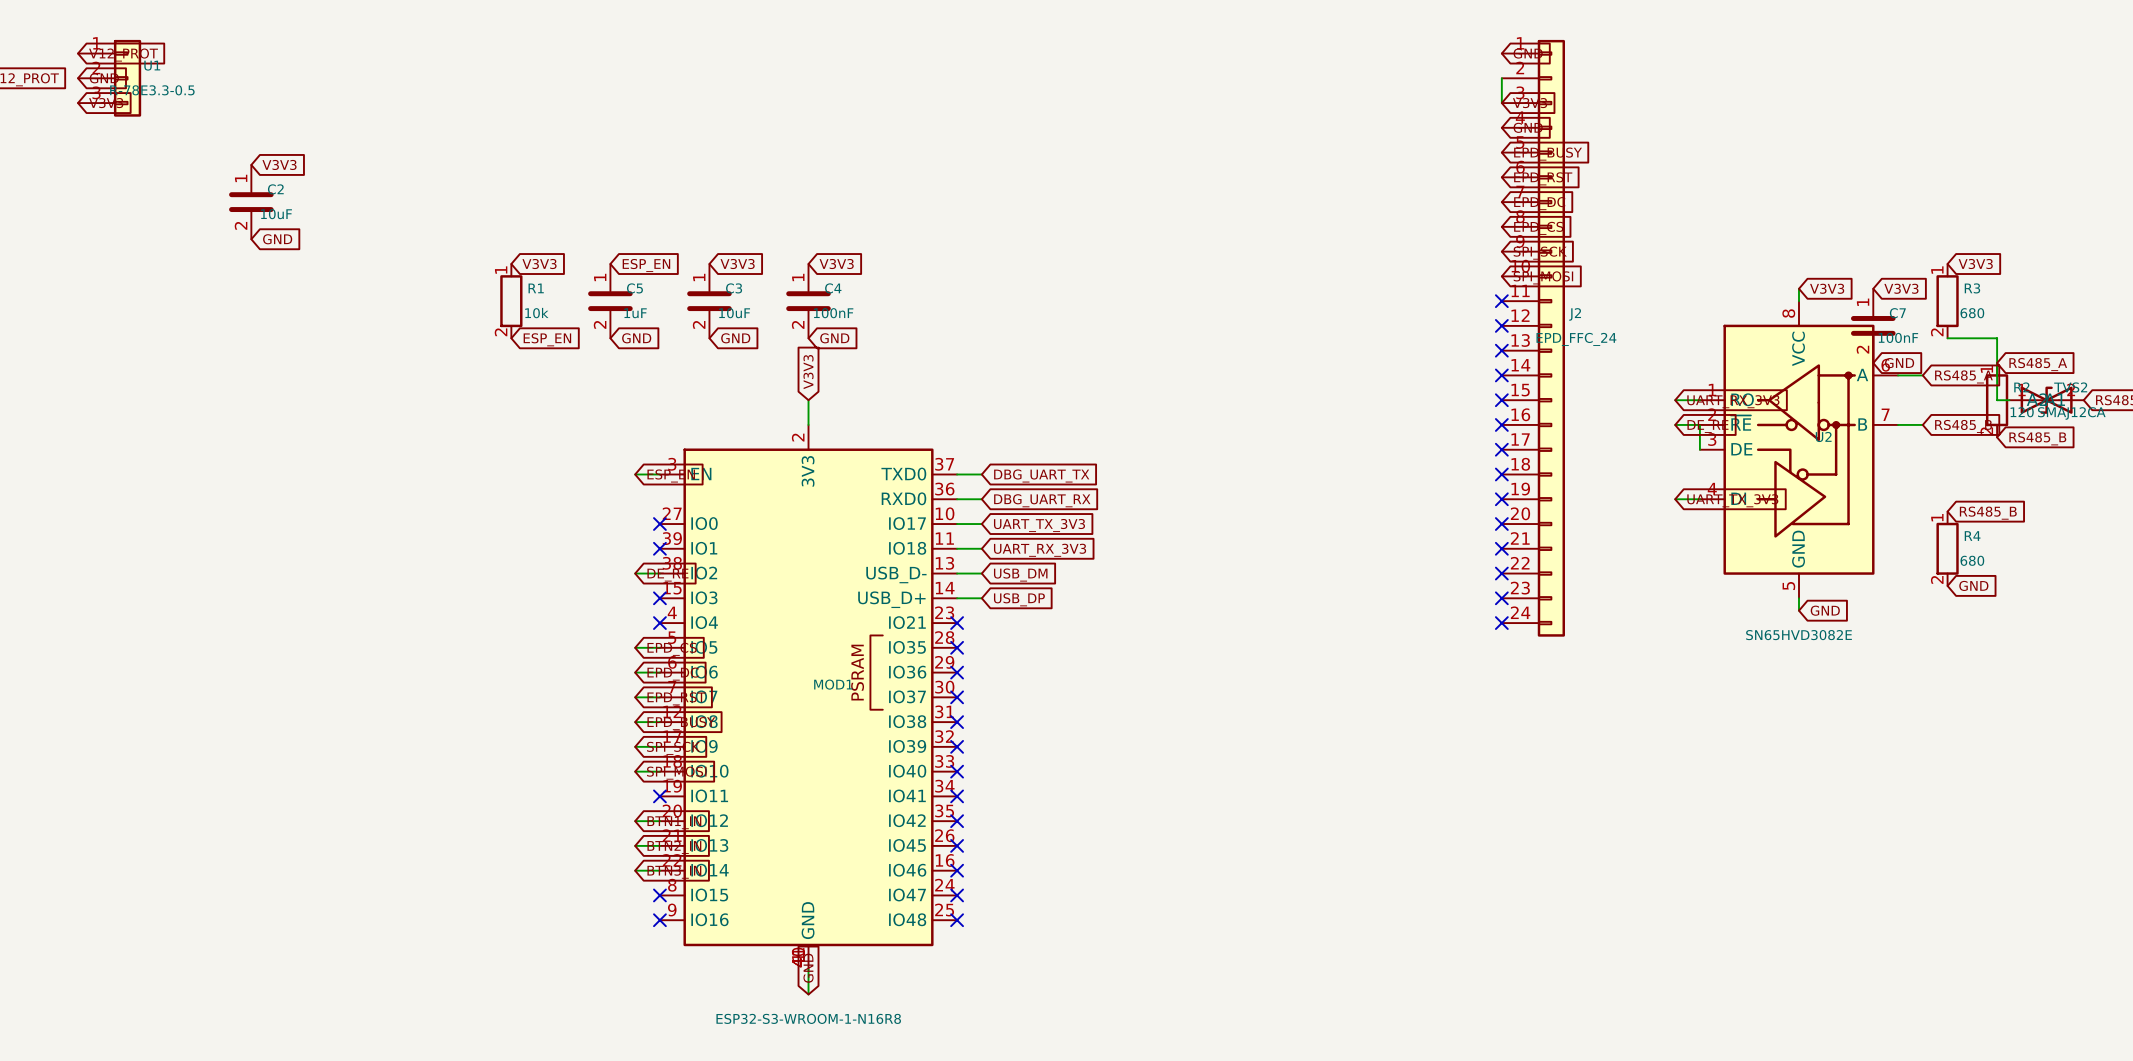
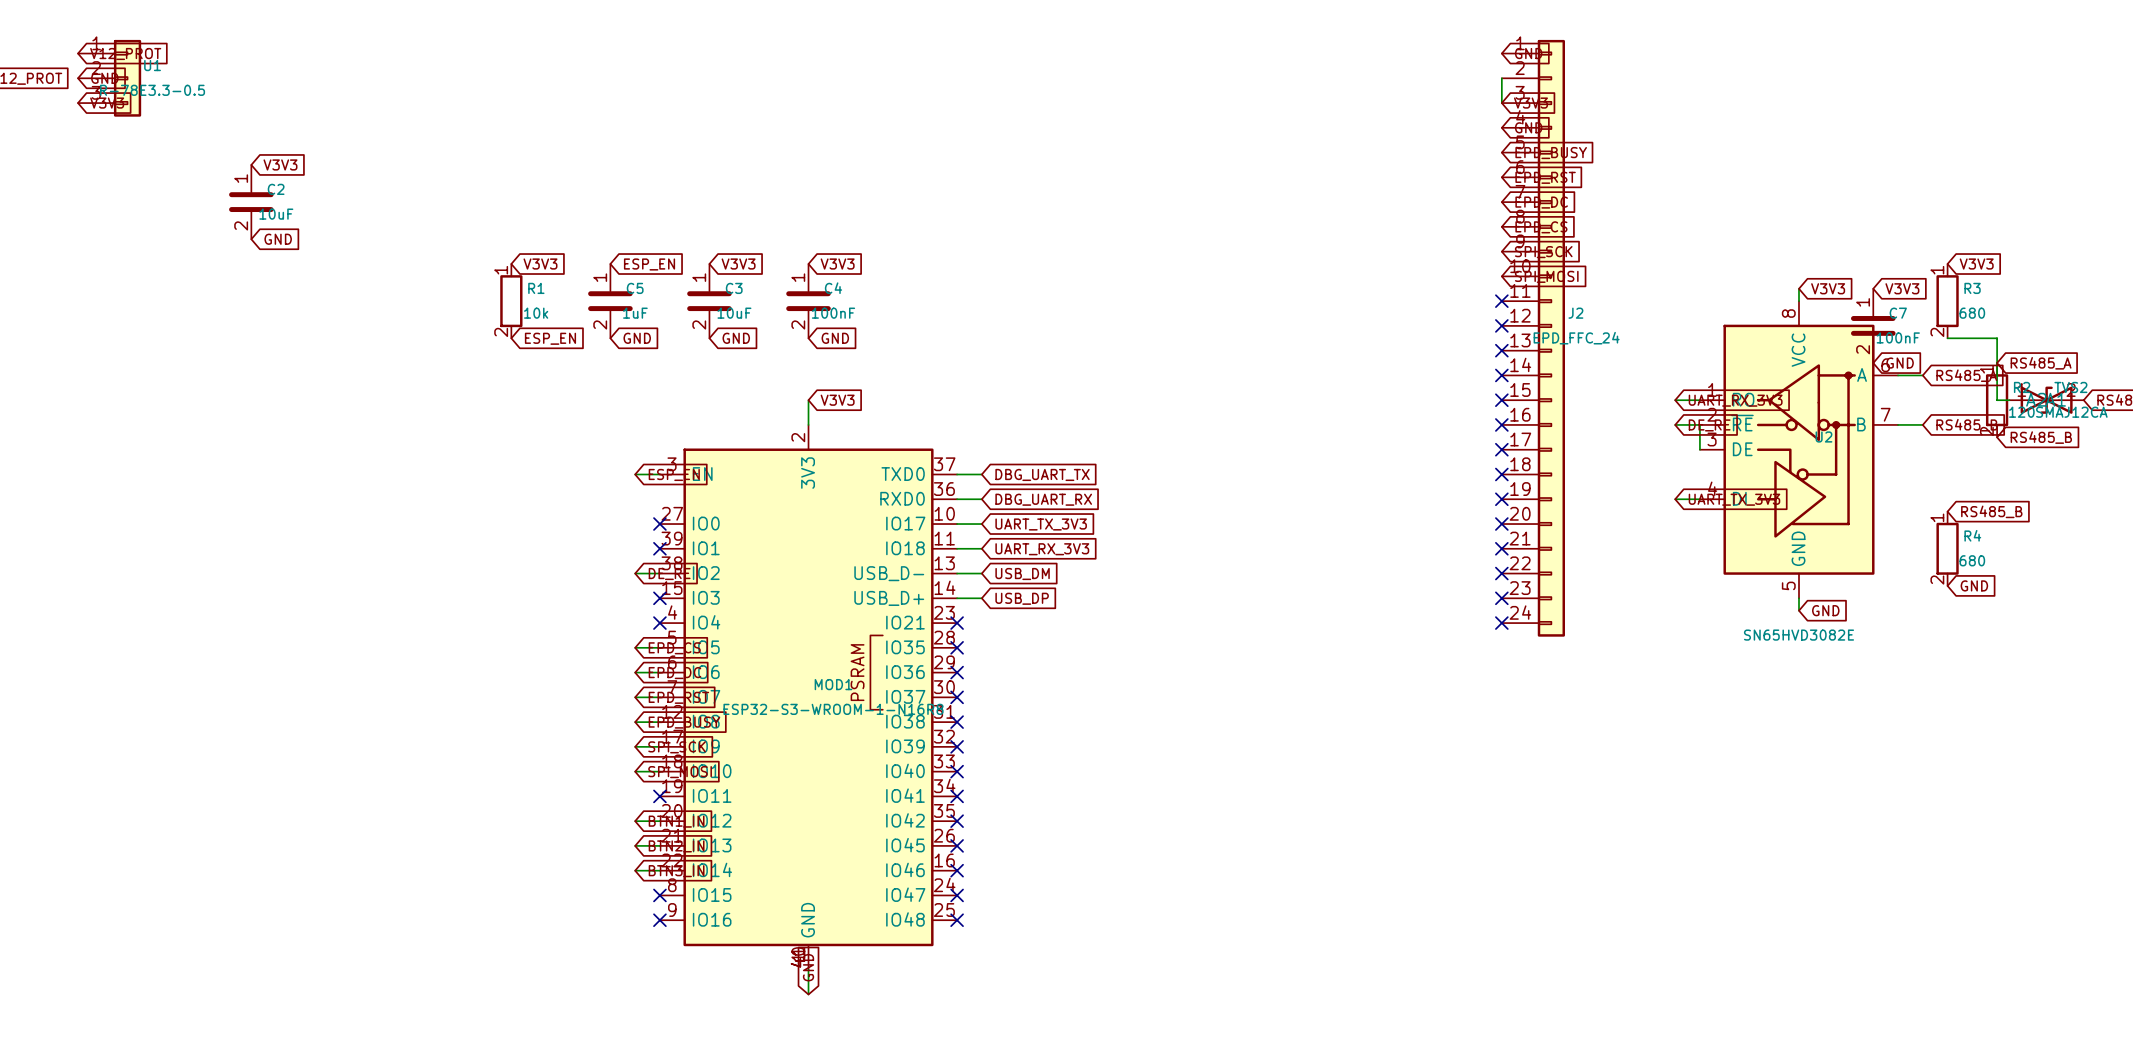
global label rotation: 0° (808, 372) -> 90° clockwise (837, 400)
MOD1 value position: ESP32-S3-WROOM-1-N16R8 (808, 1018) -> ESP32-S3-WROOM-1-N16R8 (833, 709)

